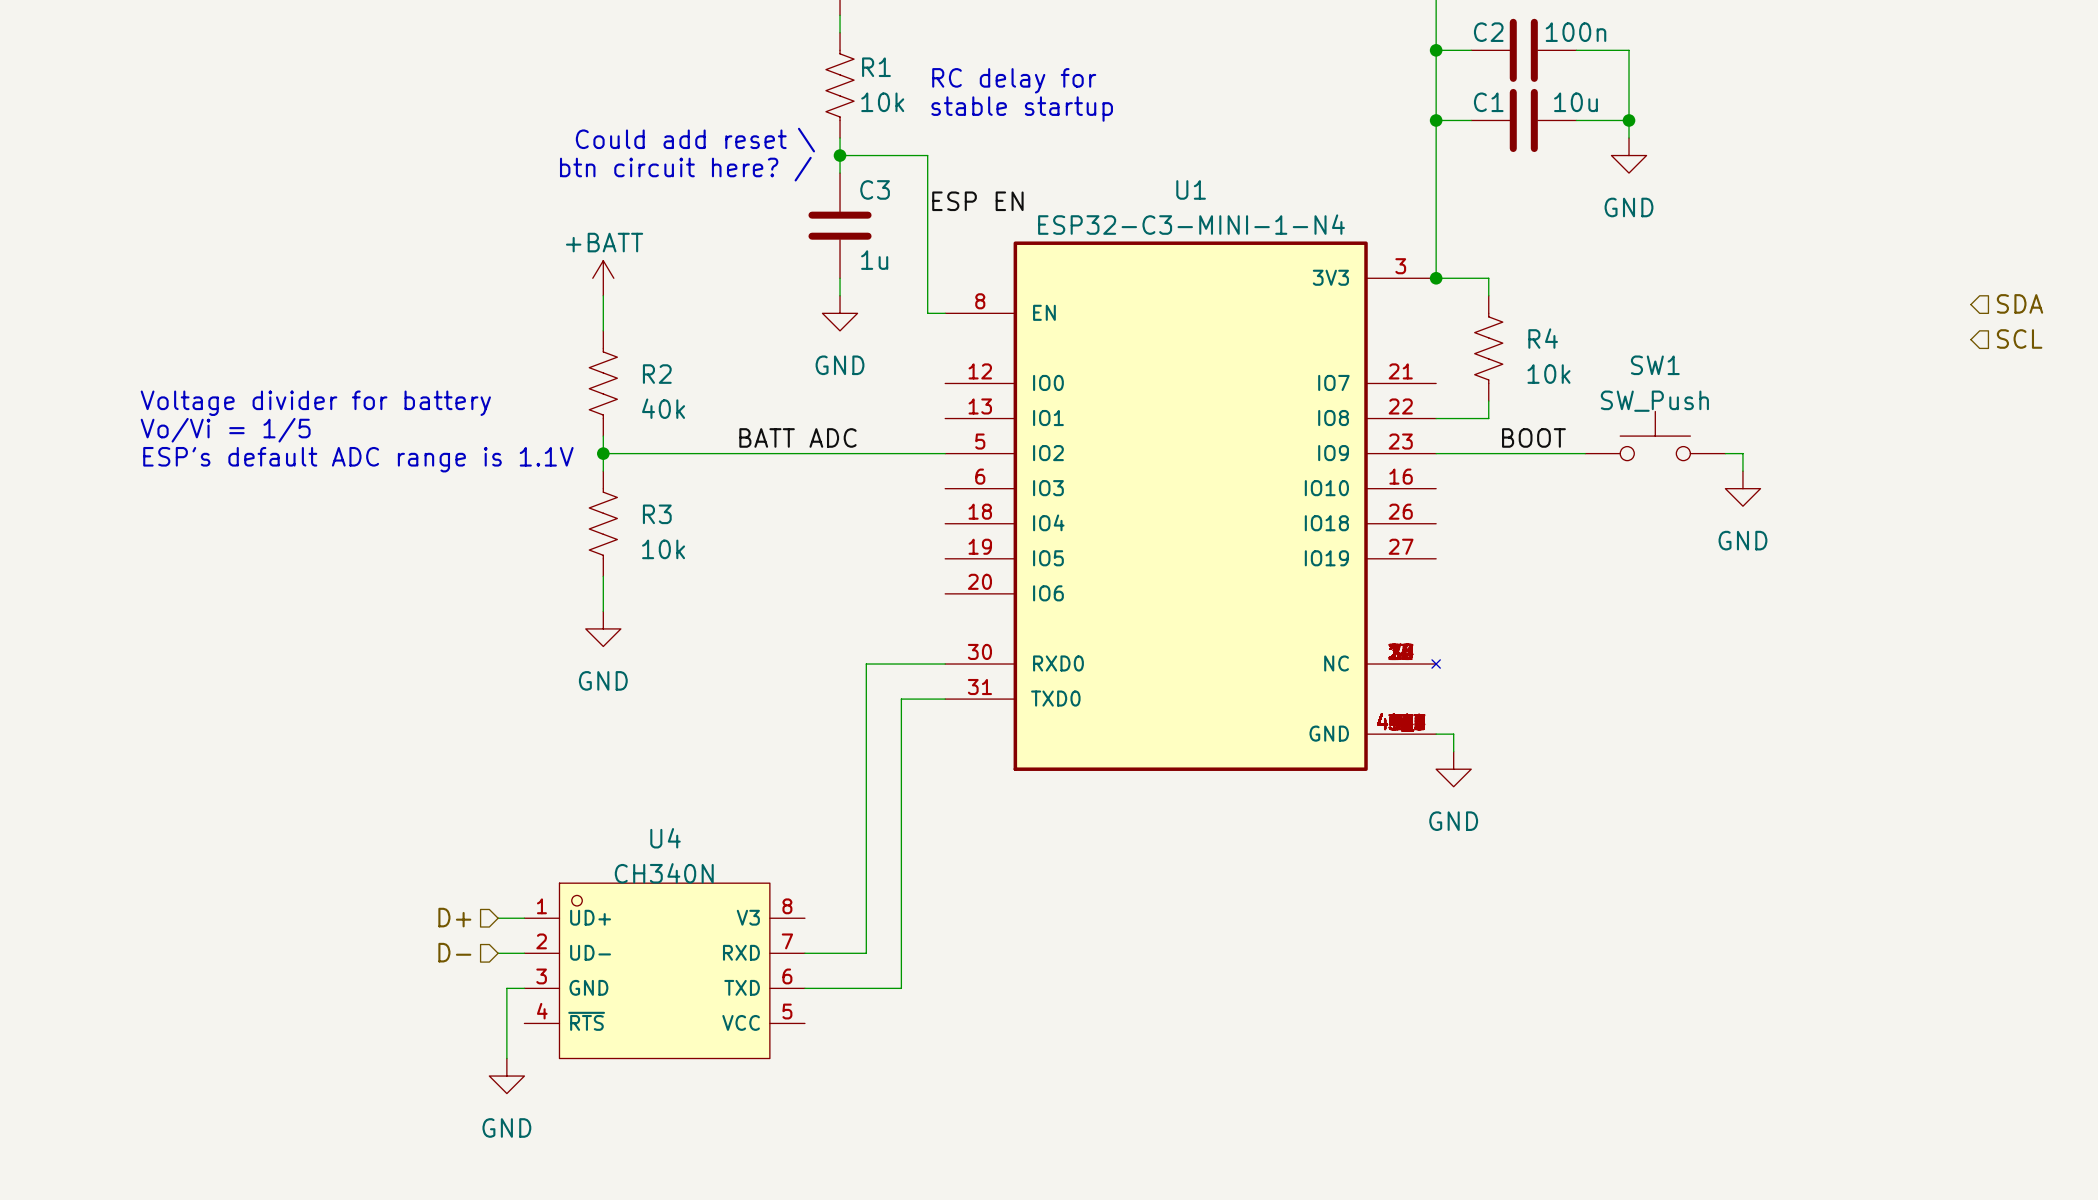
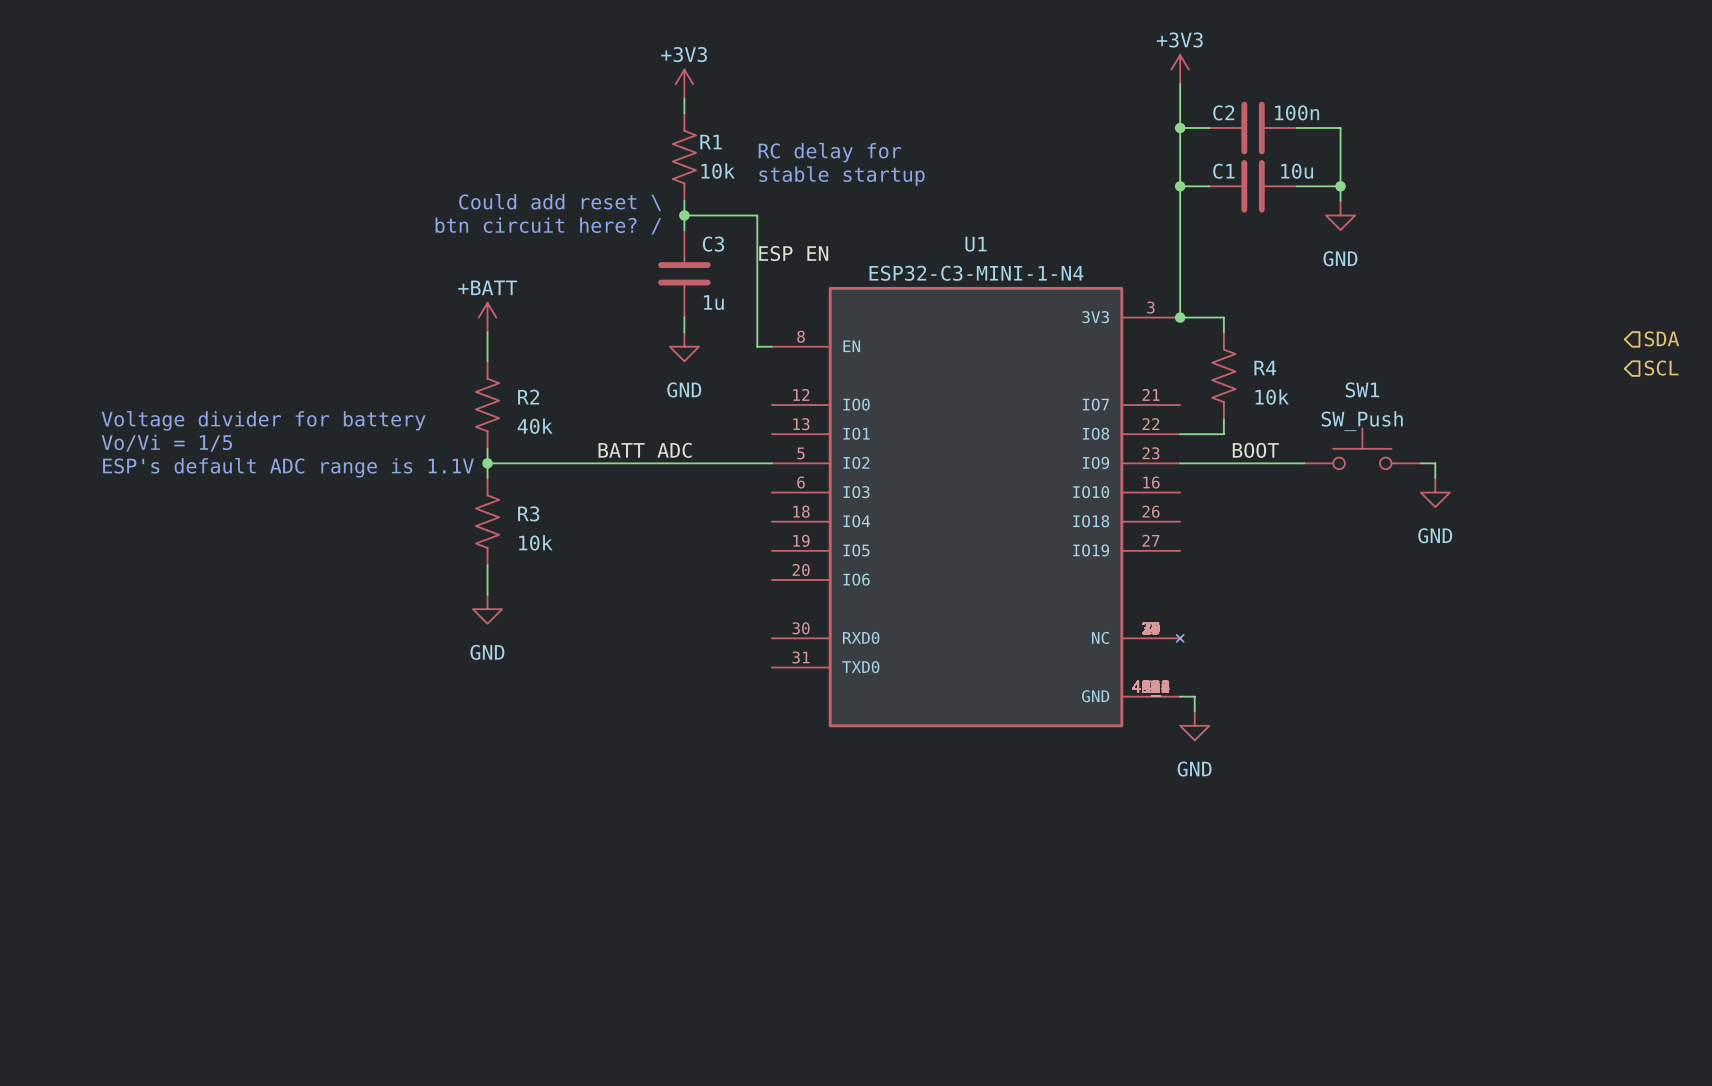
wire: (945, 664) (866, 664) (866, 953) (804, 953) -> none
wire: (945, 699) (901, 699) (901, 988) (804, 988) -> none
hierarchical label: D+ (454, 917) -> none
wire: (498, 918) (524, 918) -> none
hierarchical label: D- (454, 952) -> none
wire: (498, 953) (524, 953) -> none
U4: CH340N (664, 970) -> none
wire: (524, 988) (506, 988) (506, 1058) -> none
power symbol: GND (506, 1076) -> none

